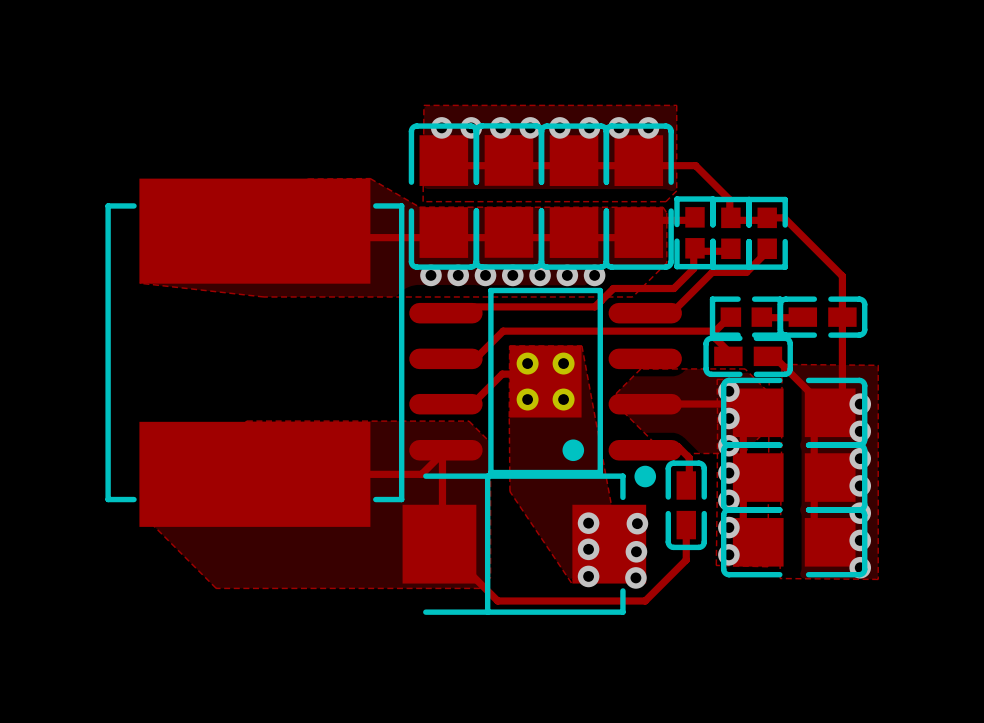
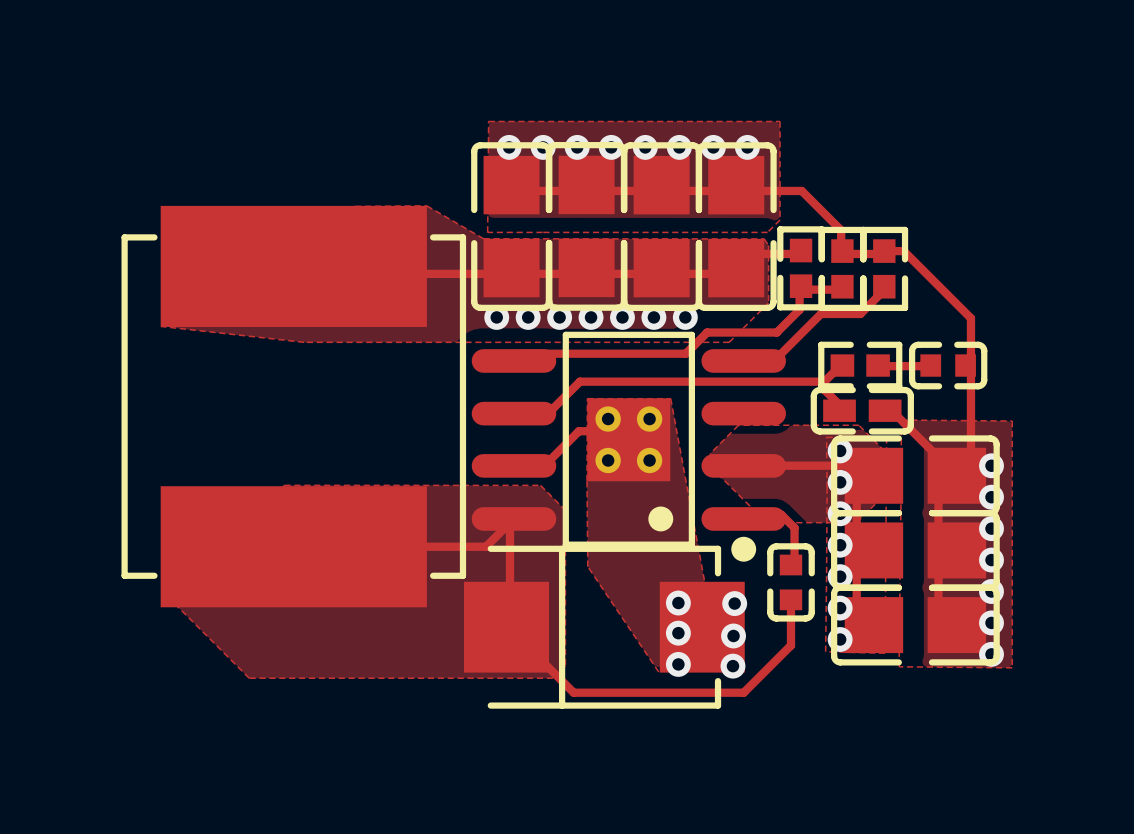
part footprint: [777, 296, 868, 338] -> [908, 341, 988, 390]
part footprint: [665, 460, 707, 551] -> [767, 543, 815, 622]

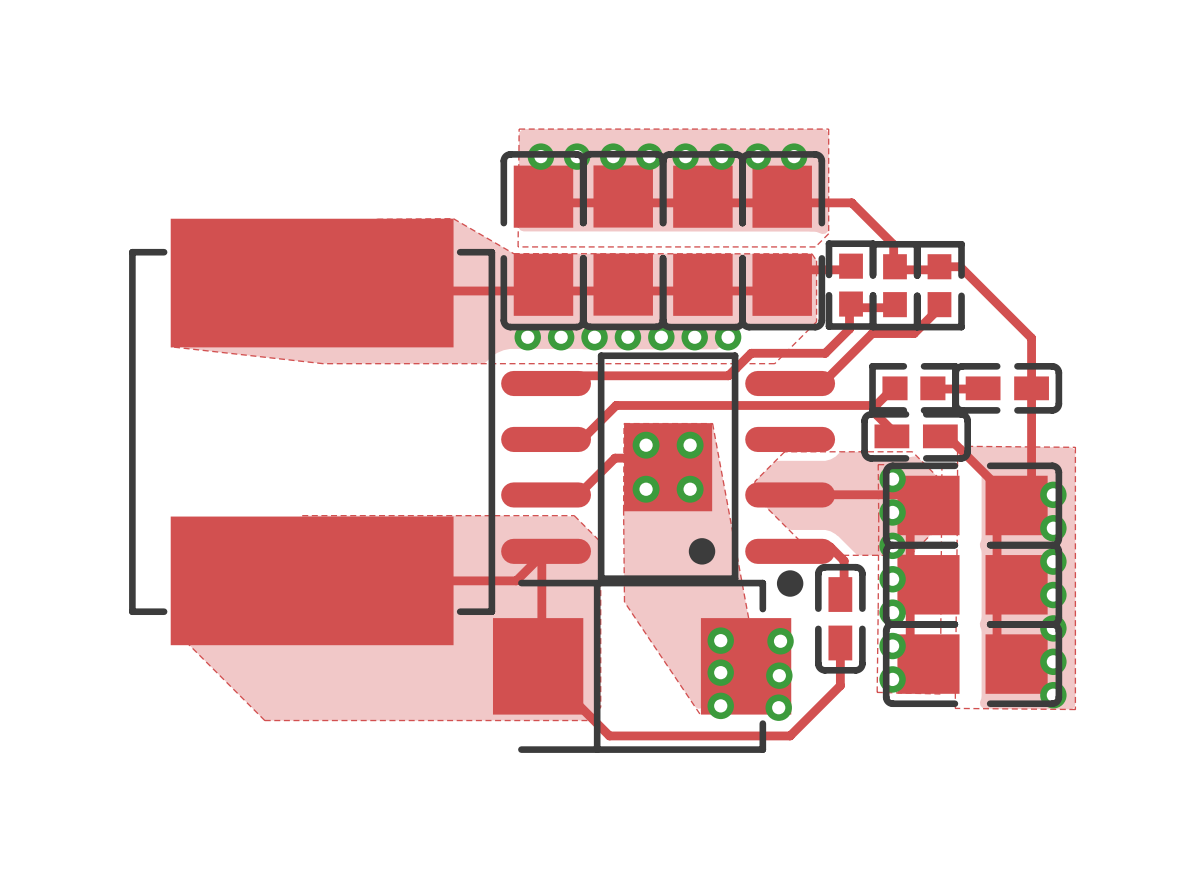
part footprint: [908, 341, 988, 390] -> [952, 363, 1063, 414]
part footprint: [767, 543, 815, 622] -> [815, 563, 866, 674]

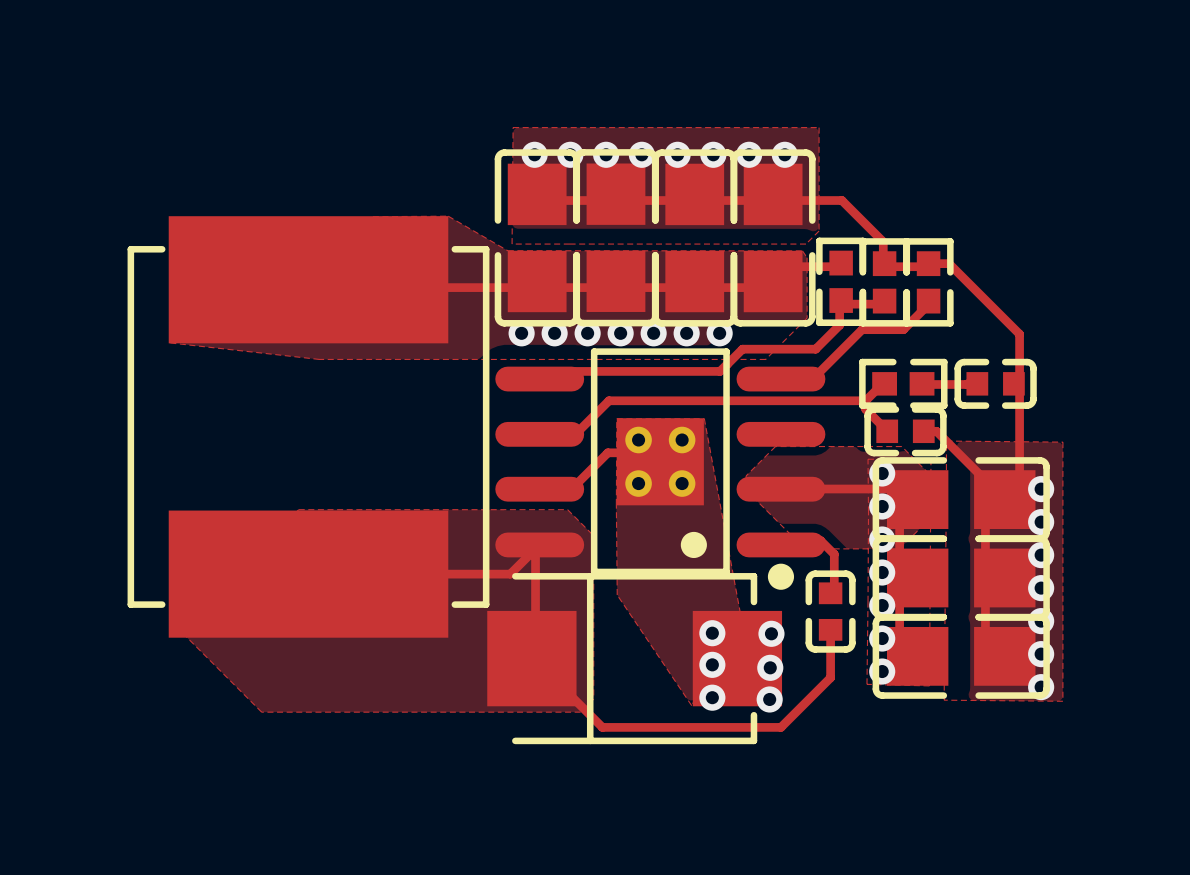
part footprint: [952, 363, 1063, 414] -> [954, 358, 1037, 409]
part footprint: [861, 411, 971, 462] -> [864, 406, 947, 457]
part footprint: [815, 563, 866, 674] -> [805, 570, 856, 653]

